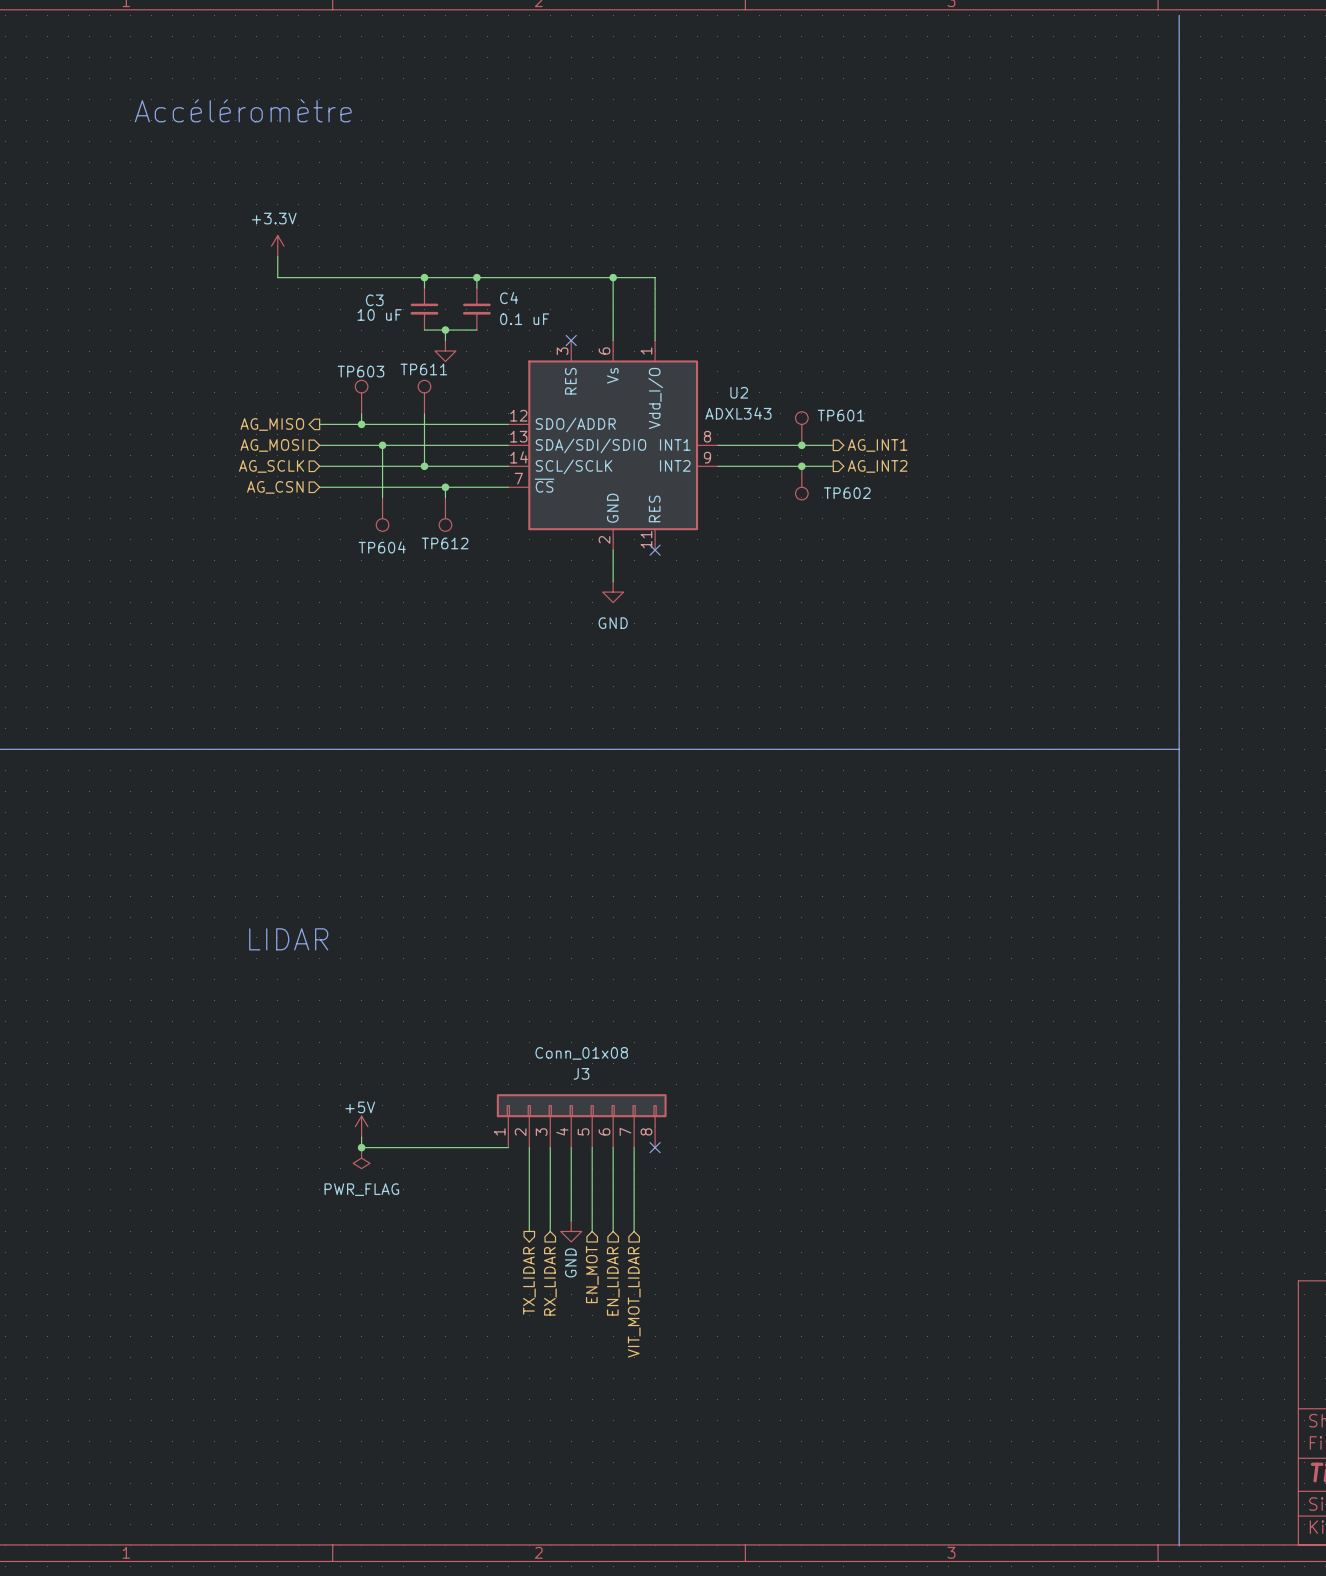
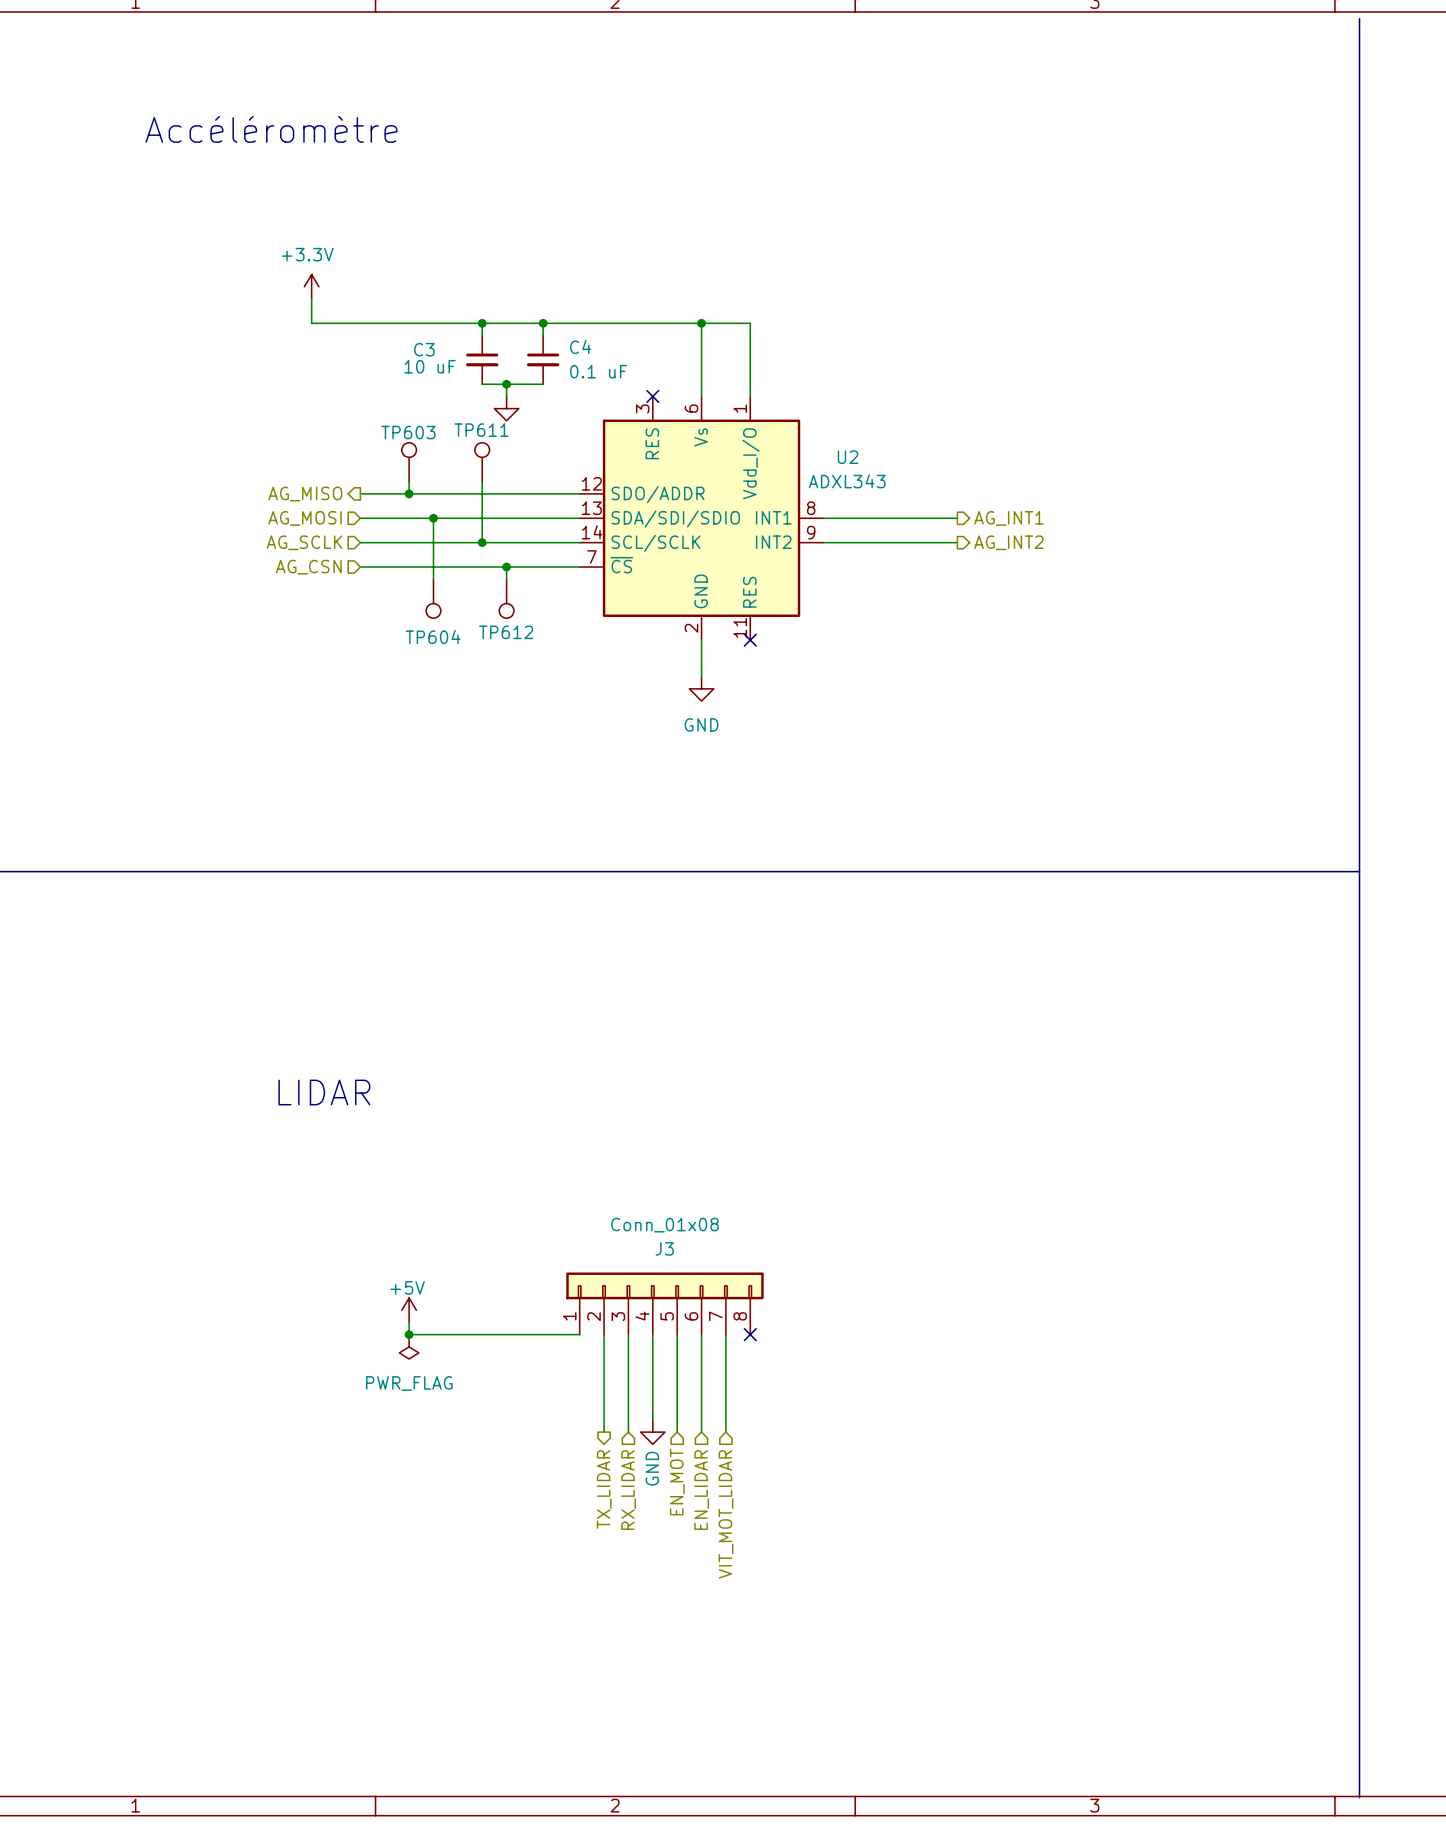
TP601: (801, 428) -> none
junction: (801, 445) -> none
junction: (801, 466) -> none
TP602: (801, 483) -> none

